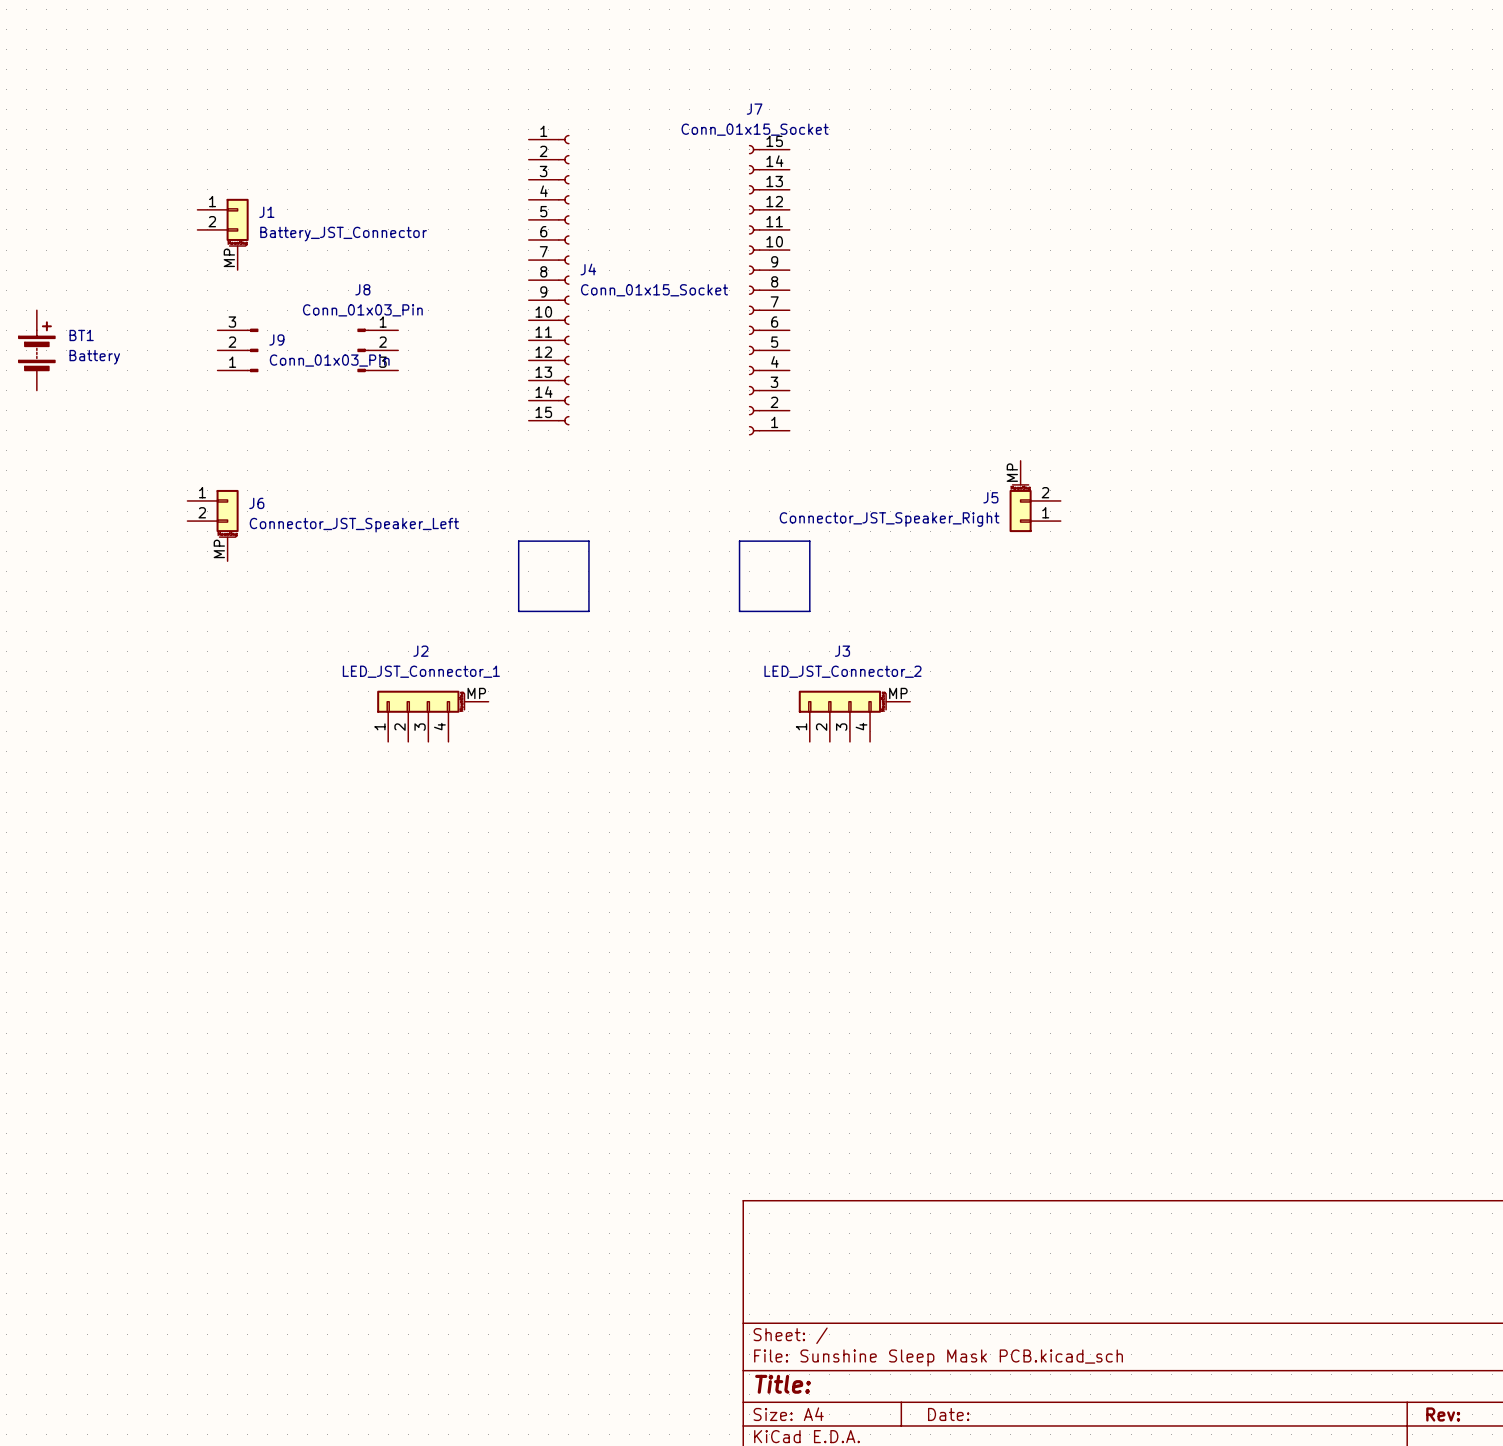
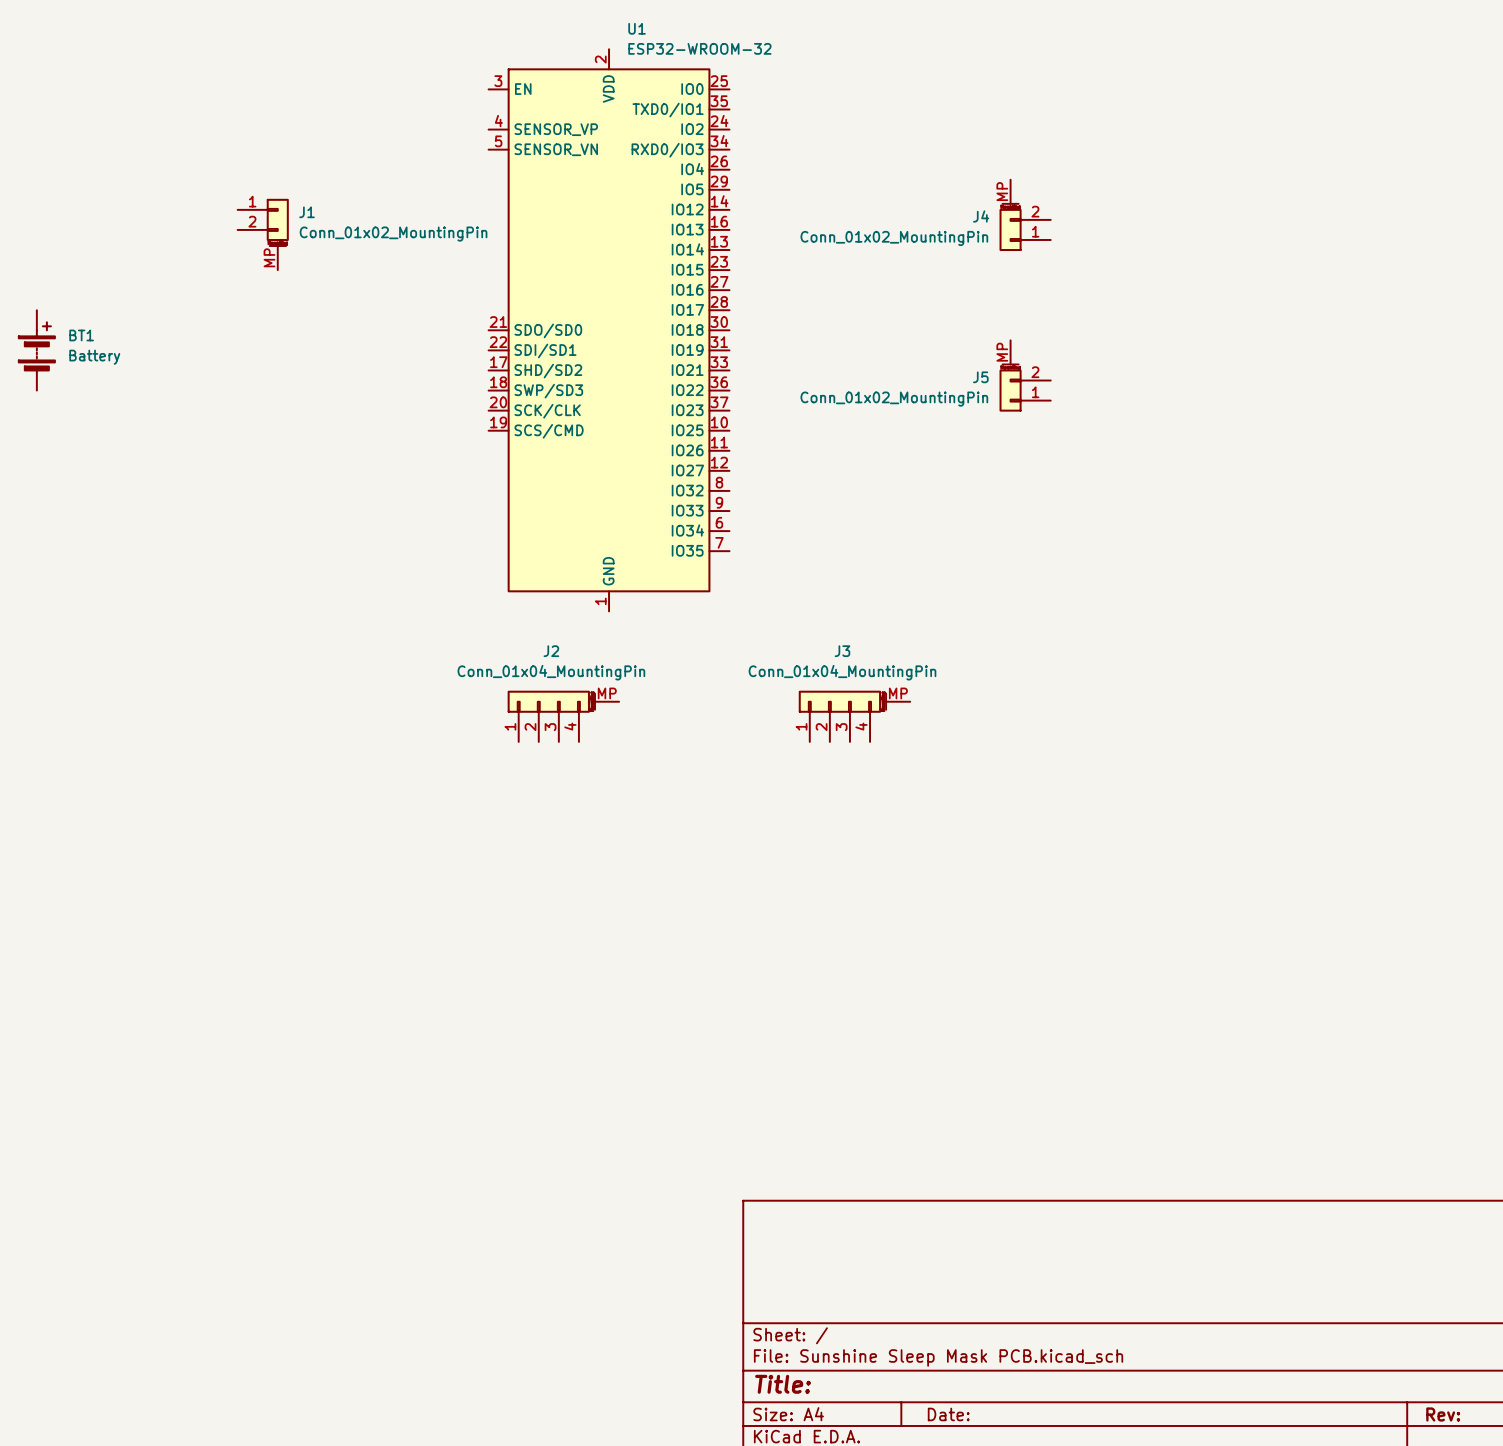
J4 symbol: [528, 134, 570, 426] -> [999, 179, 1051, 252]
J1 position: (223, 234) -> (263, 234)
J1 value: Battery_JST_Connector (343, 234) -> Conn_01x02_MountingPin (393, 234)
J4 name position: J4 (588, 269) -> J4 (981, 216)
J4 value: Conn_01x15_Socket (654, 290) -> Conn_01x02_MountingPin (894, 238)
J7: Conn_01x15_Socket (769, 290) -> none
U1: none -> ESP32-WROOM-32 (609, 330)
J9: Conn_01x03_Pin (237, 350) -> none
J8: Conn_01x03_Pin (377, 350) -> none
J5 position: (1035, 496) -> (1025, 376)
J5 value: Connector_JST_Speaker_Right (889, 519) -> Conn_01x02_MountingPin (894, 399)
J6: Connector_JST_Speaker_Left (213, 525) -> none
line: (518, 541) (588, 541) (588, 611) (518, 611) (518, 541) -> none
line: (739, 541) (809, 541) (809, 611) (739, 611) (739, 541) -> none
J2 value: LED_JST_Connector_1 (421, 671) -> Conn_01x04_MountingPin (551, 672)
J3 value: LED_JST_Connector_2 (842, 671) -> Conn_01x04_MountingPin (842, 672)
J2 position: (432, 716) -> (563, 716)

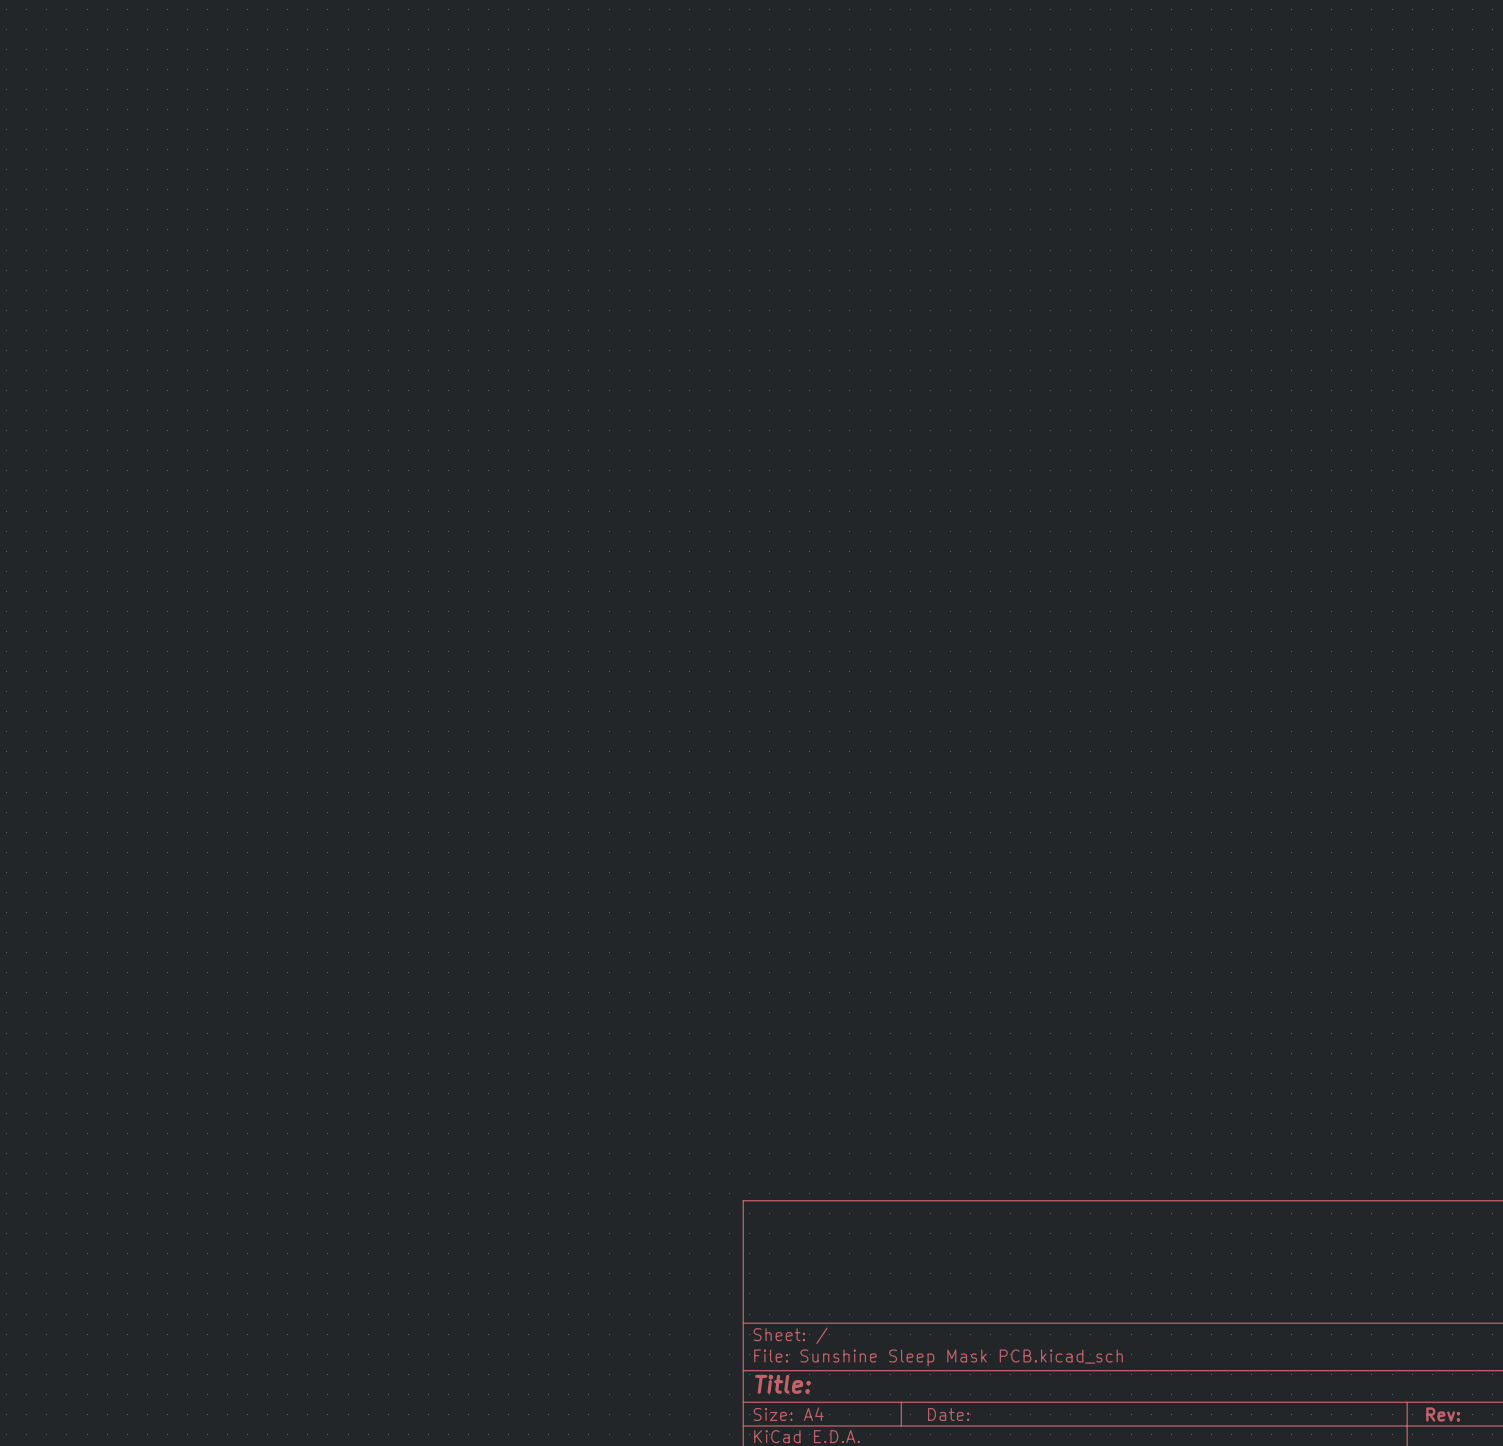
J4: Conn_01x02_MountingPin (1025, 215) -> none
J1: Conn_01x02_MountingPin (263, 234) -> none
U1: ESP32-WROOM-32 (609, 330) -> none
BT1: Battery (36, 350) -> none
J5: Conn_01x02_MountingPin (1025, 376) -> none
J2: Conn_01x04_MountingPin (563, 716) -> none
J3: Conn_01x04_MountingPin (854, 716) -> none

